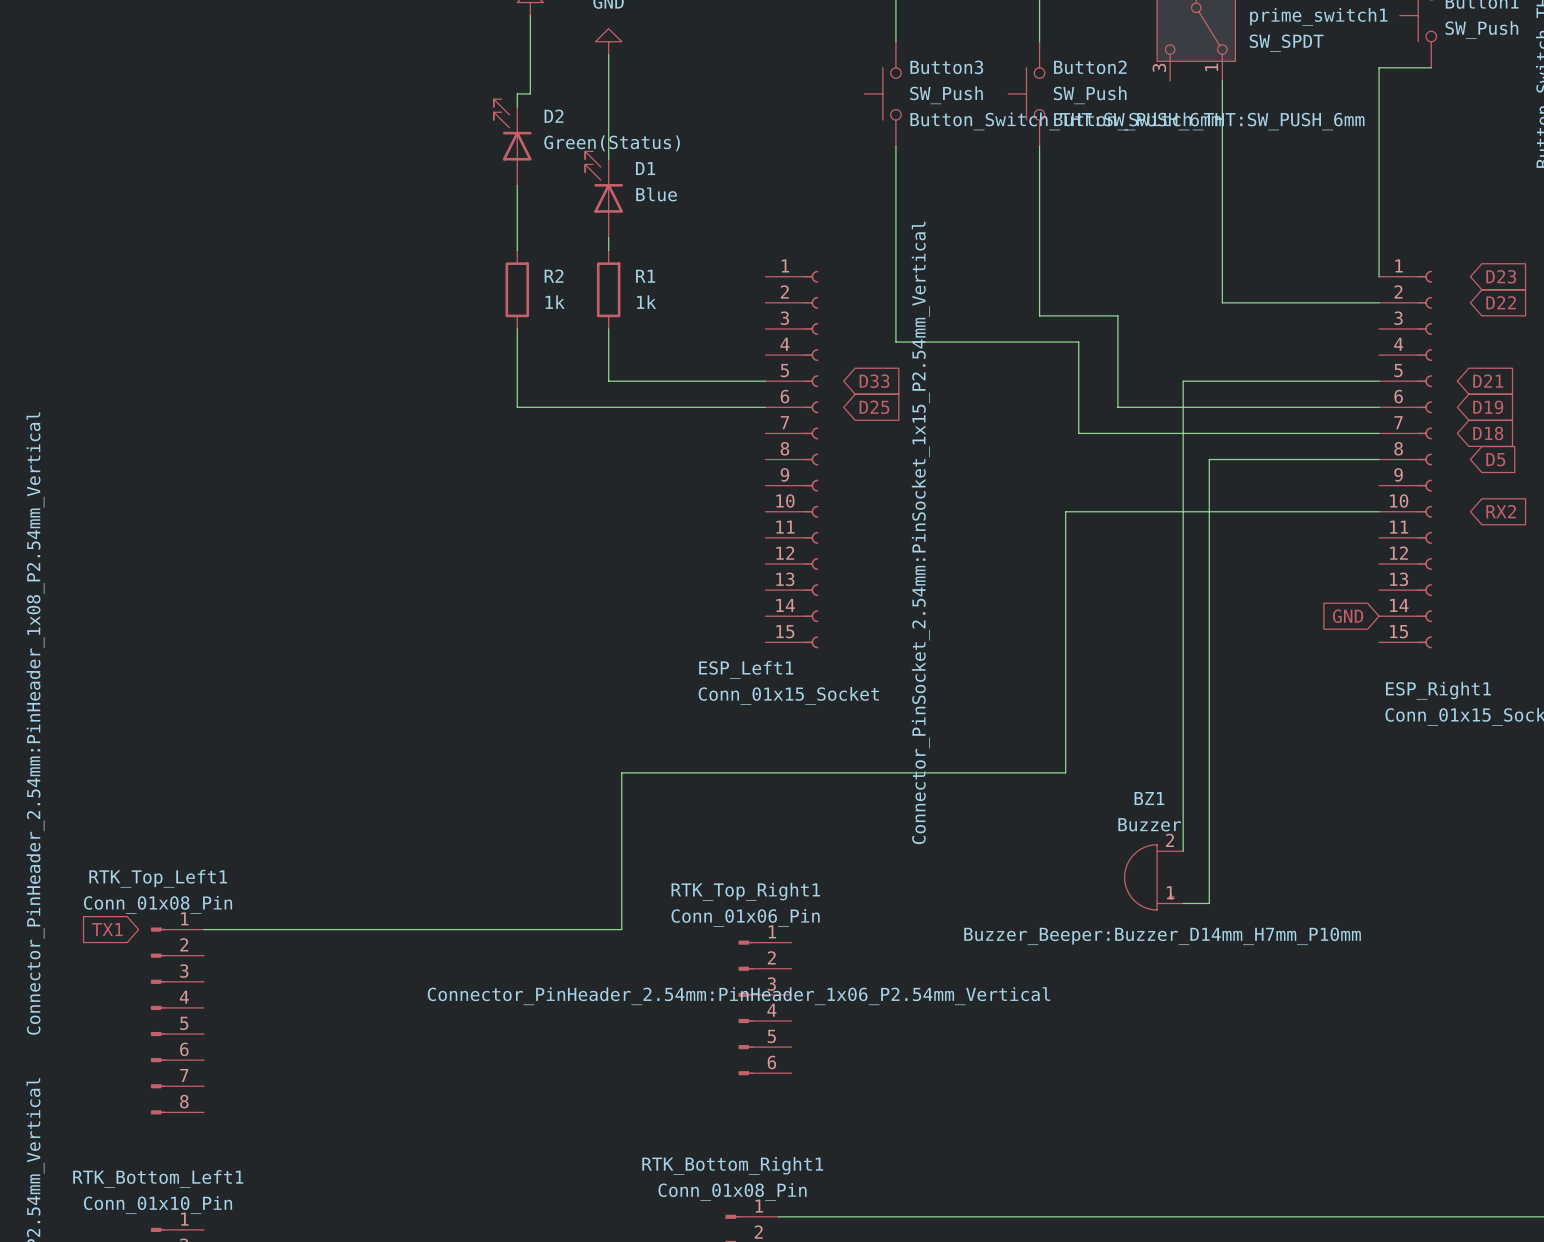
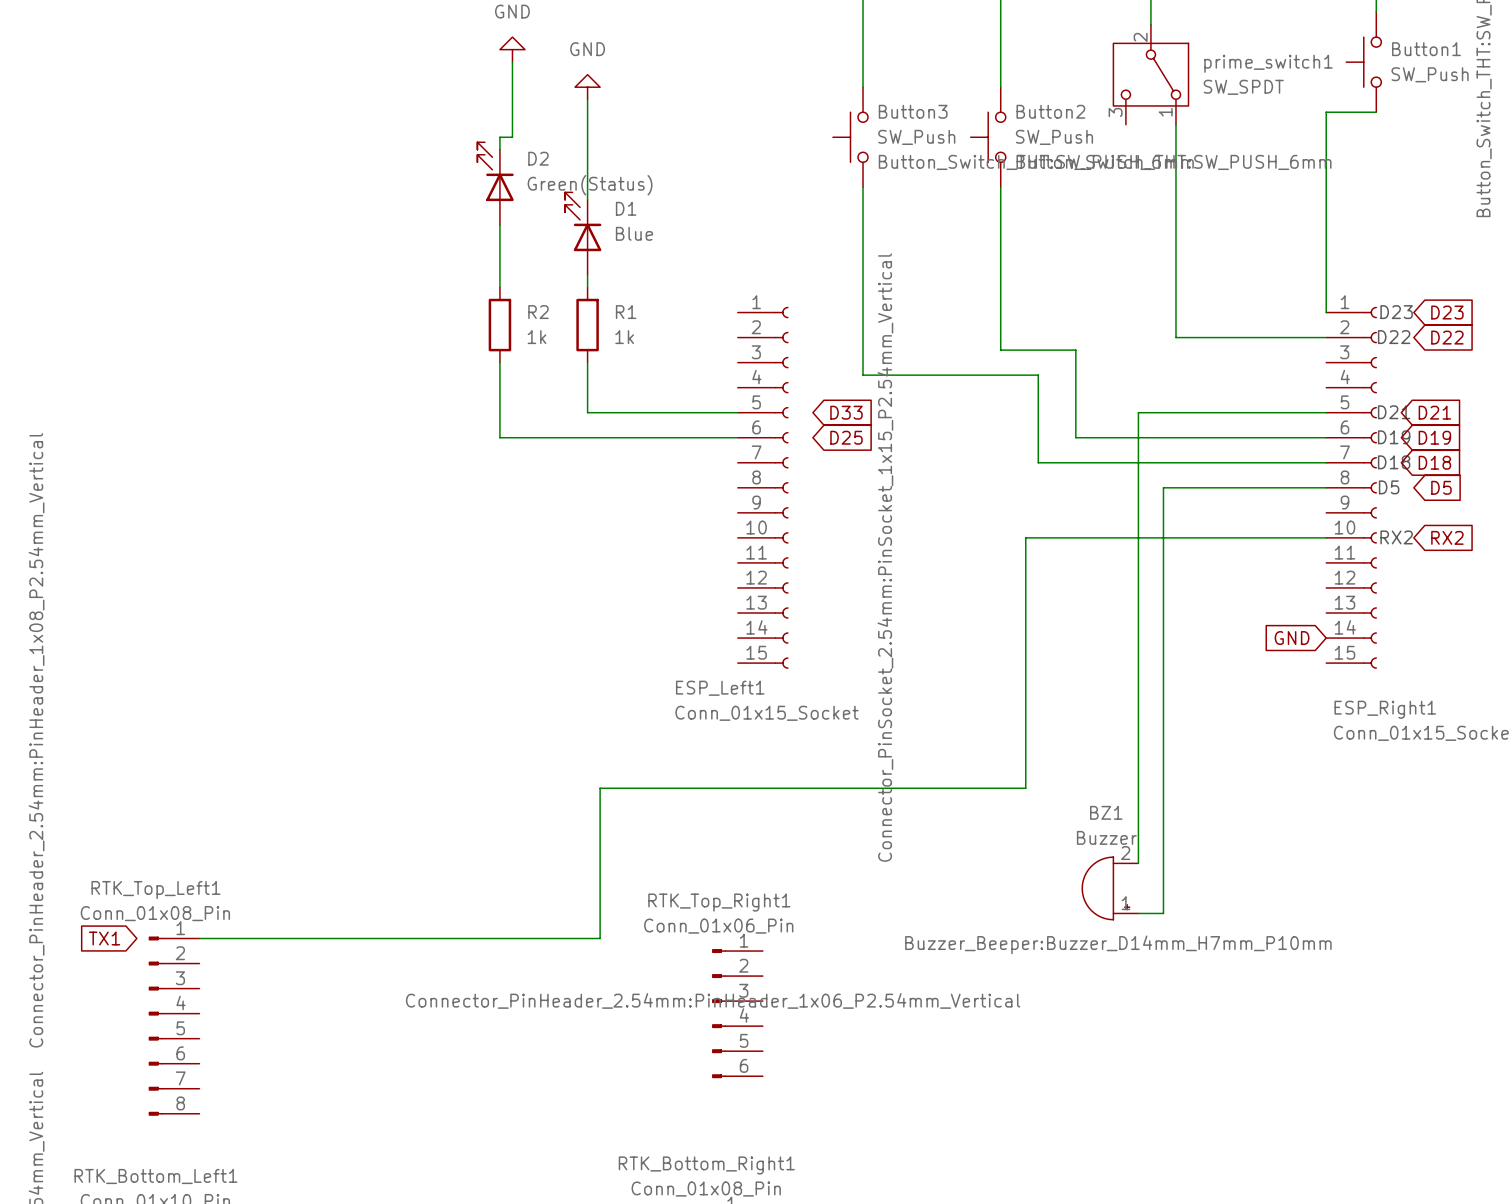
text: none -> D23 (1396, 312)
text: none -> D22 (1394, 337)
text: none -> D21 (1394, 412)
text: none -> D19 (1394, 437)
text: none -> D18 (1394, 462)
text: none -> D5 (1389, 487)
text: none -> RX2 (1396, 537)

